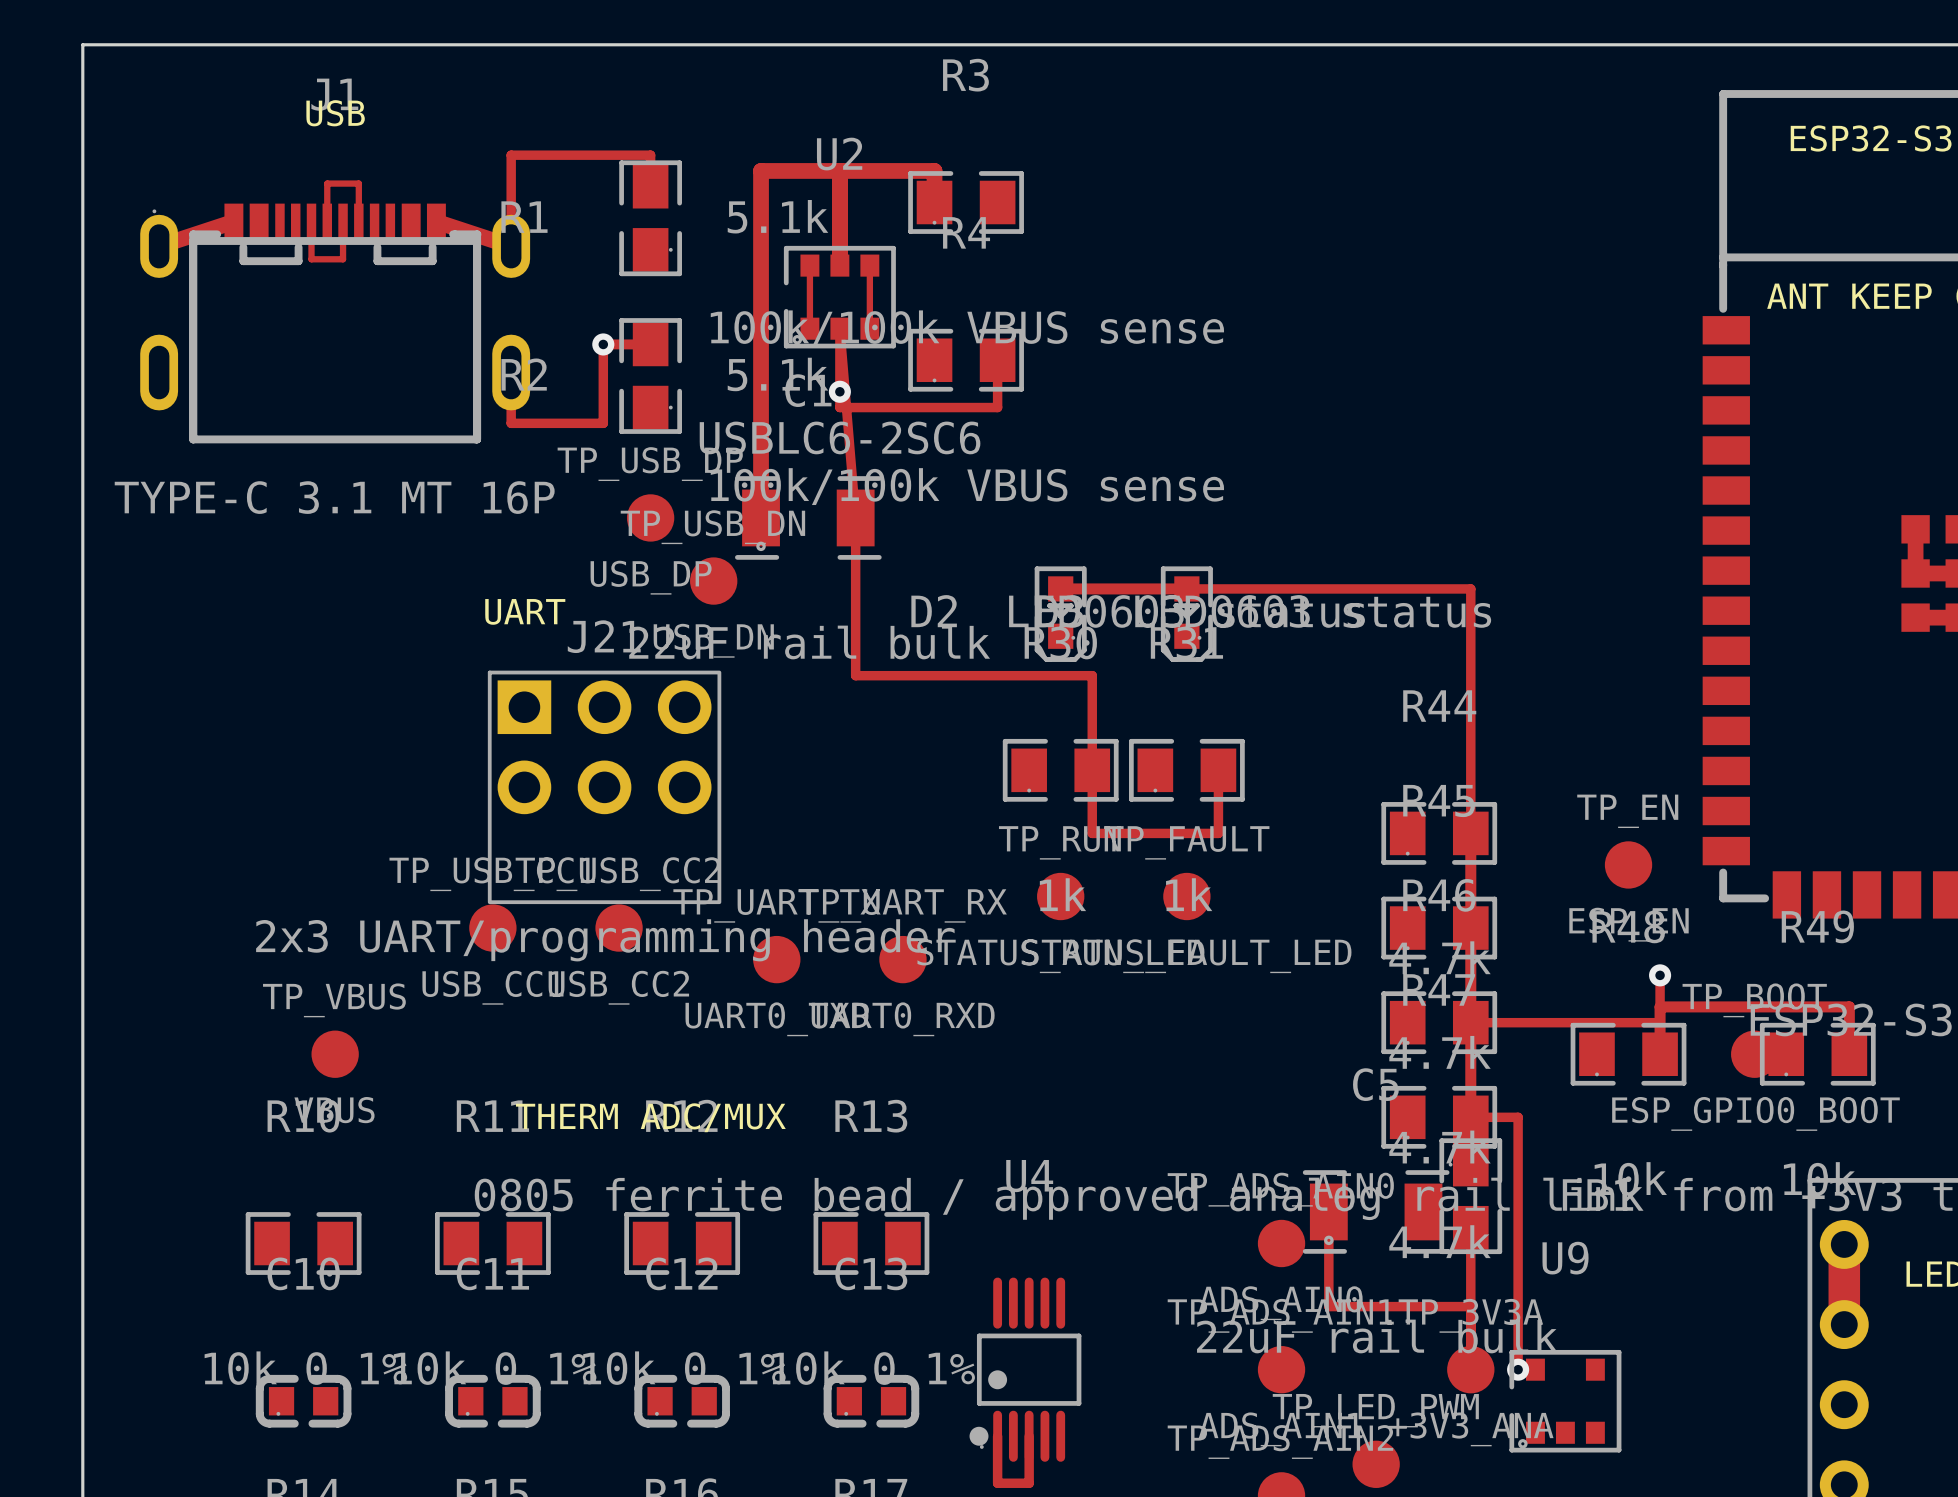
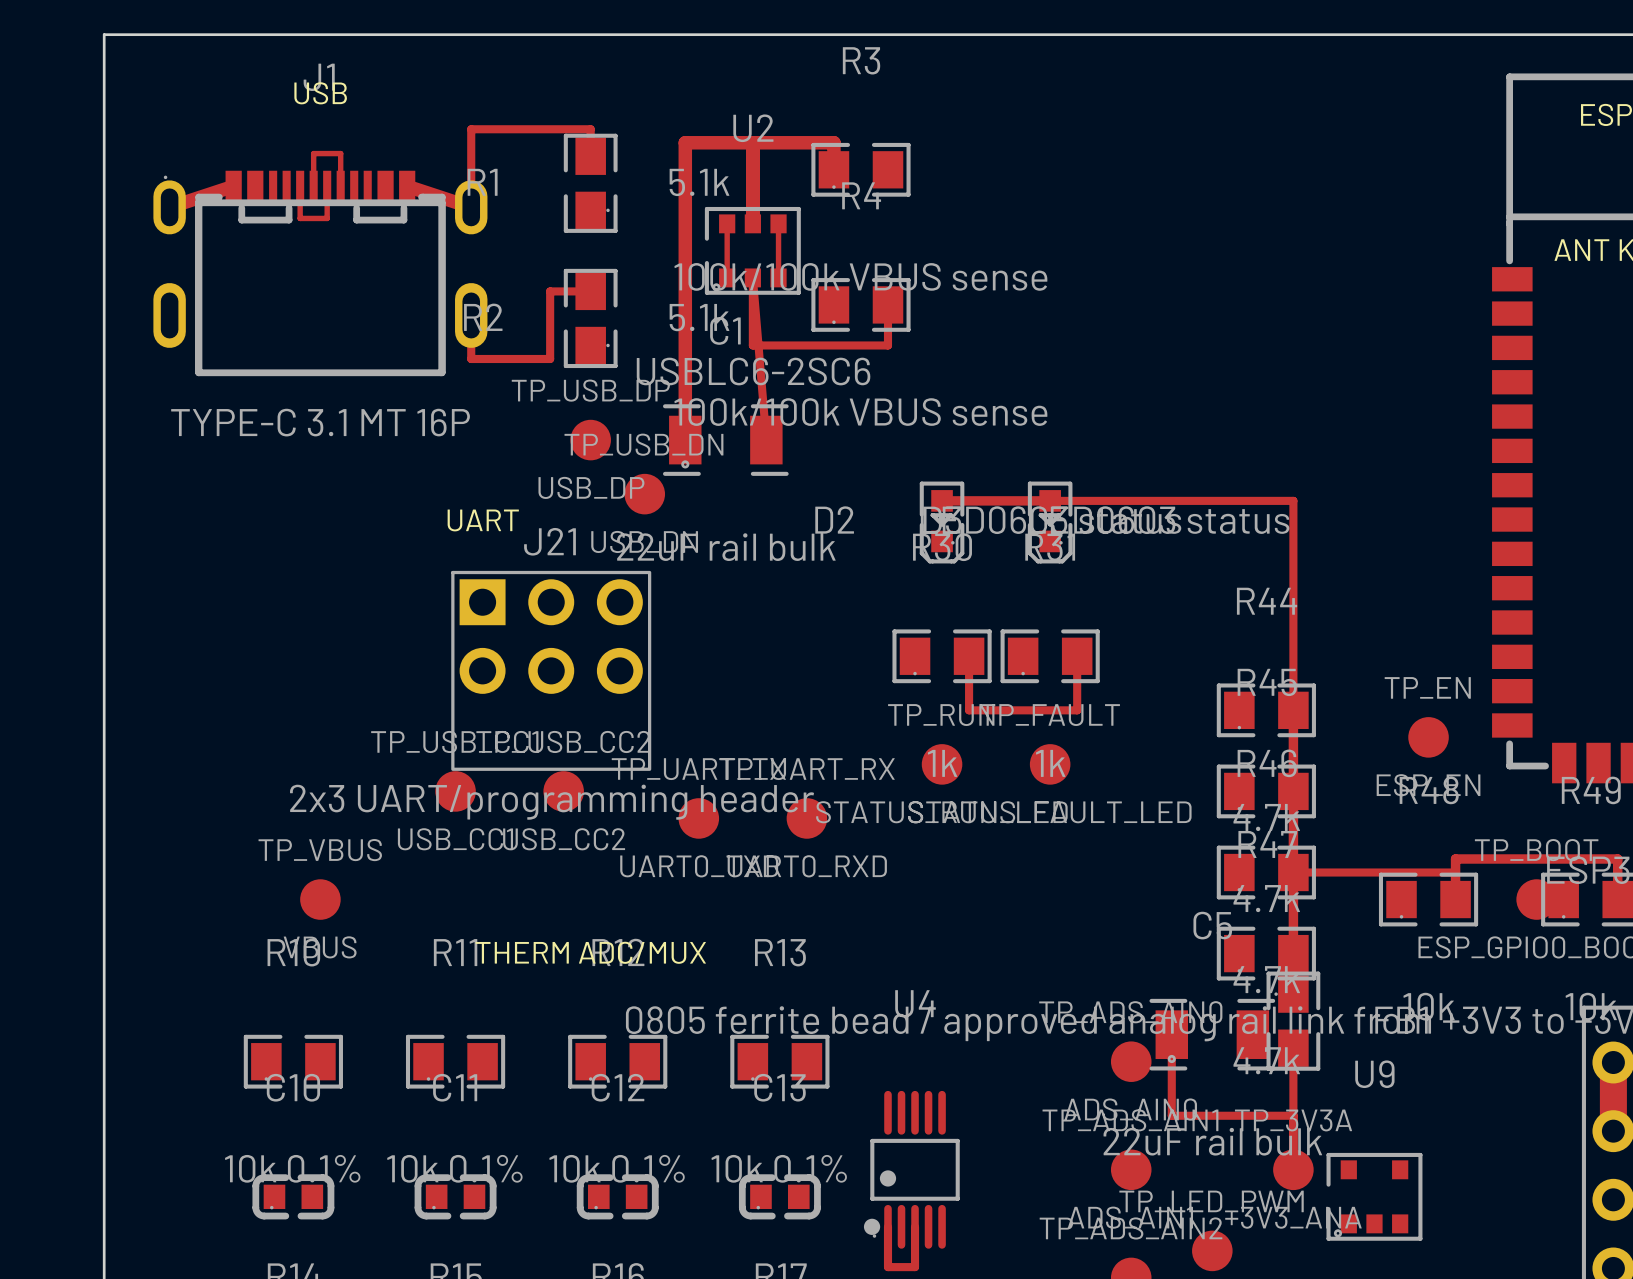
via: (603, 344) -> none
via: (839, 391) -> none
track: (855, 517) (855, 675) (1092, 675) (1092, 770) -> none
track: (1660, 975) (1660, 1006) -> none
via: (1660, 975) -> none
track: (1470, 1117) (1518, 1117) (1518, 1369) (1535, 1369) -> none
via: (1518, 1369) -> none

